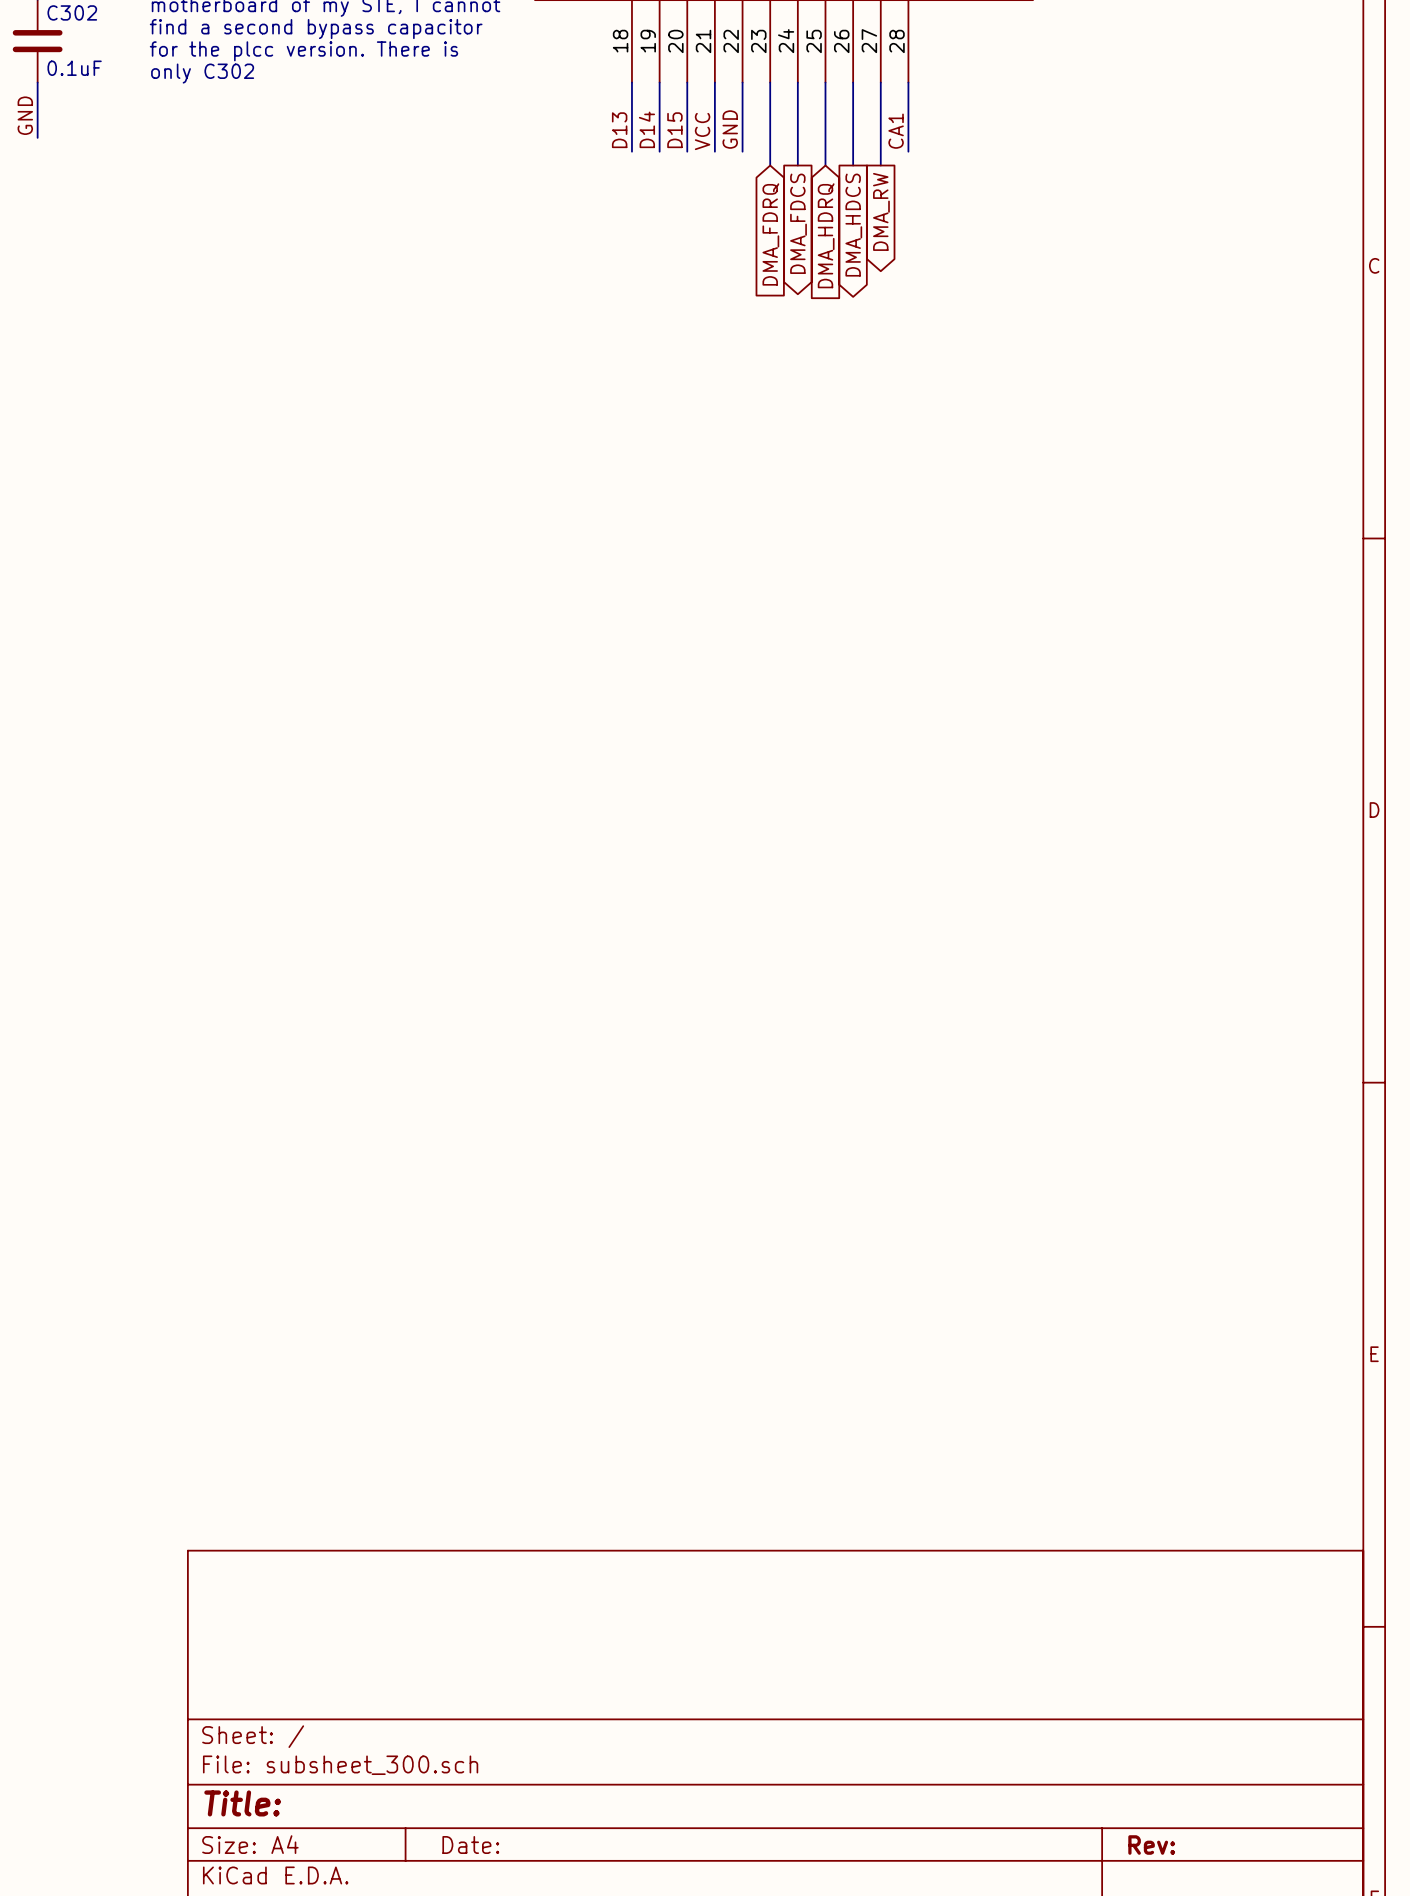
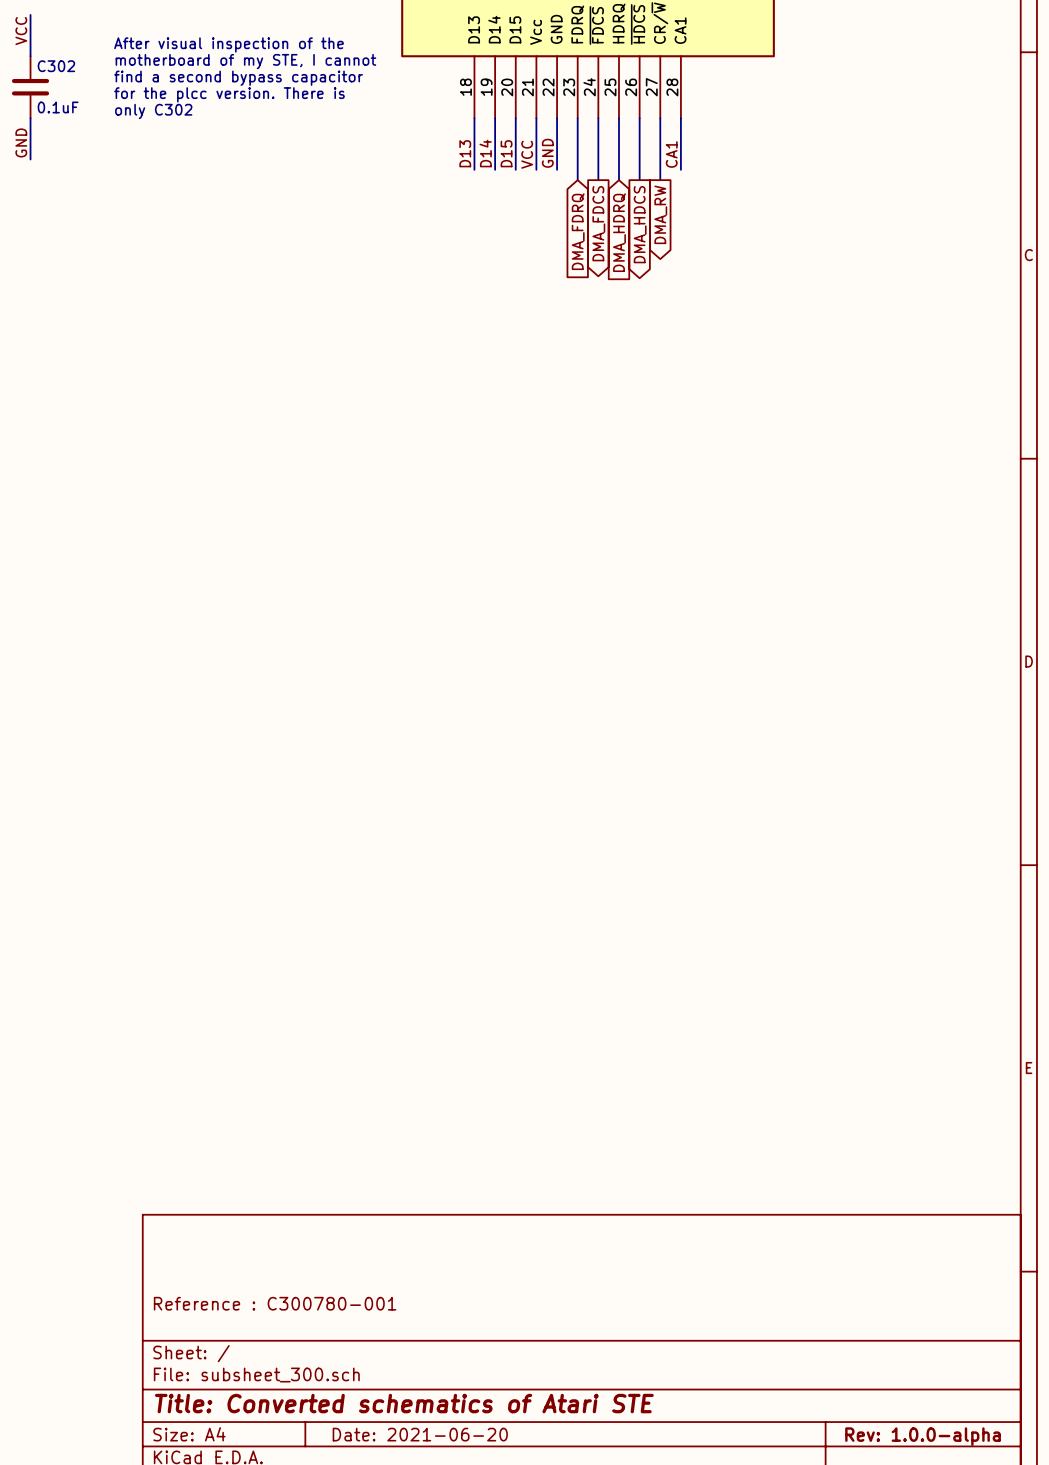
title block: none -> Reference : C300780-001 (275, 1303)
title block: Title: (242, 1803) -> Title: Converted schematics of Atari STE (404, 1403)
title block: Date: (470, 1845) -> Date: 2021-06-20 (420, 1434)
title block: Rev: (1151, 1845) -> Rev: 1.0.0-alpha (923, 1436)

